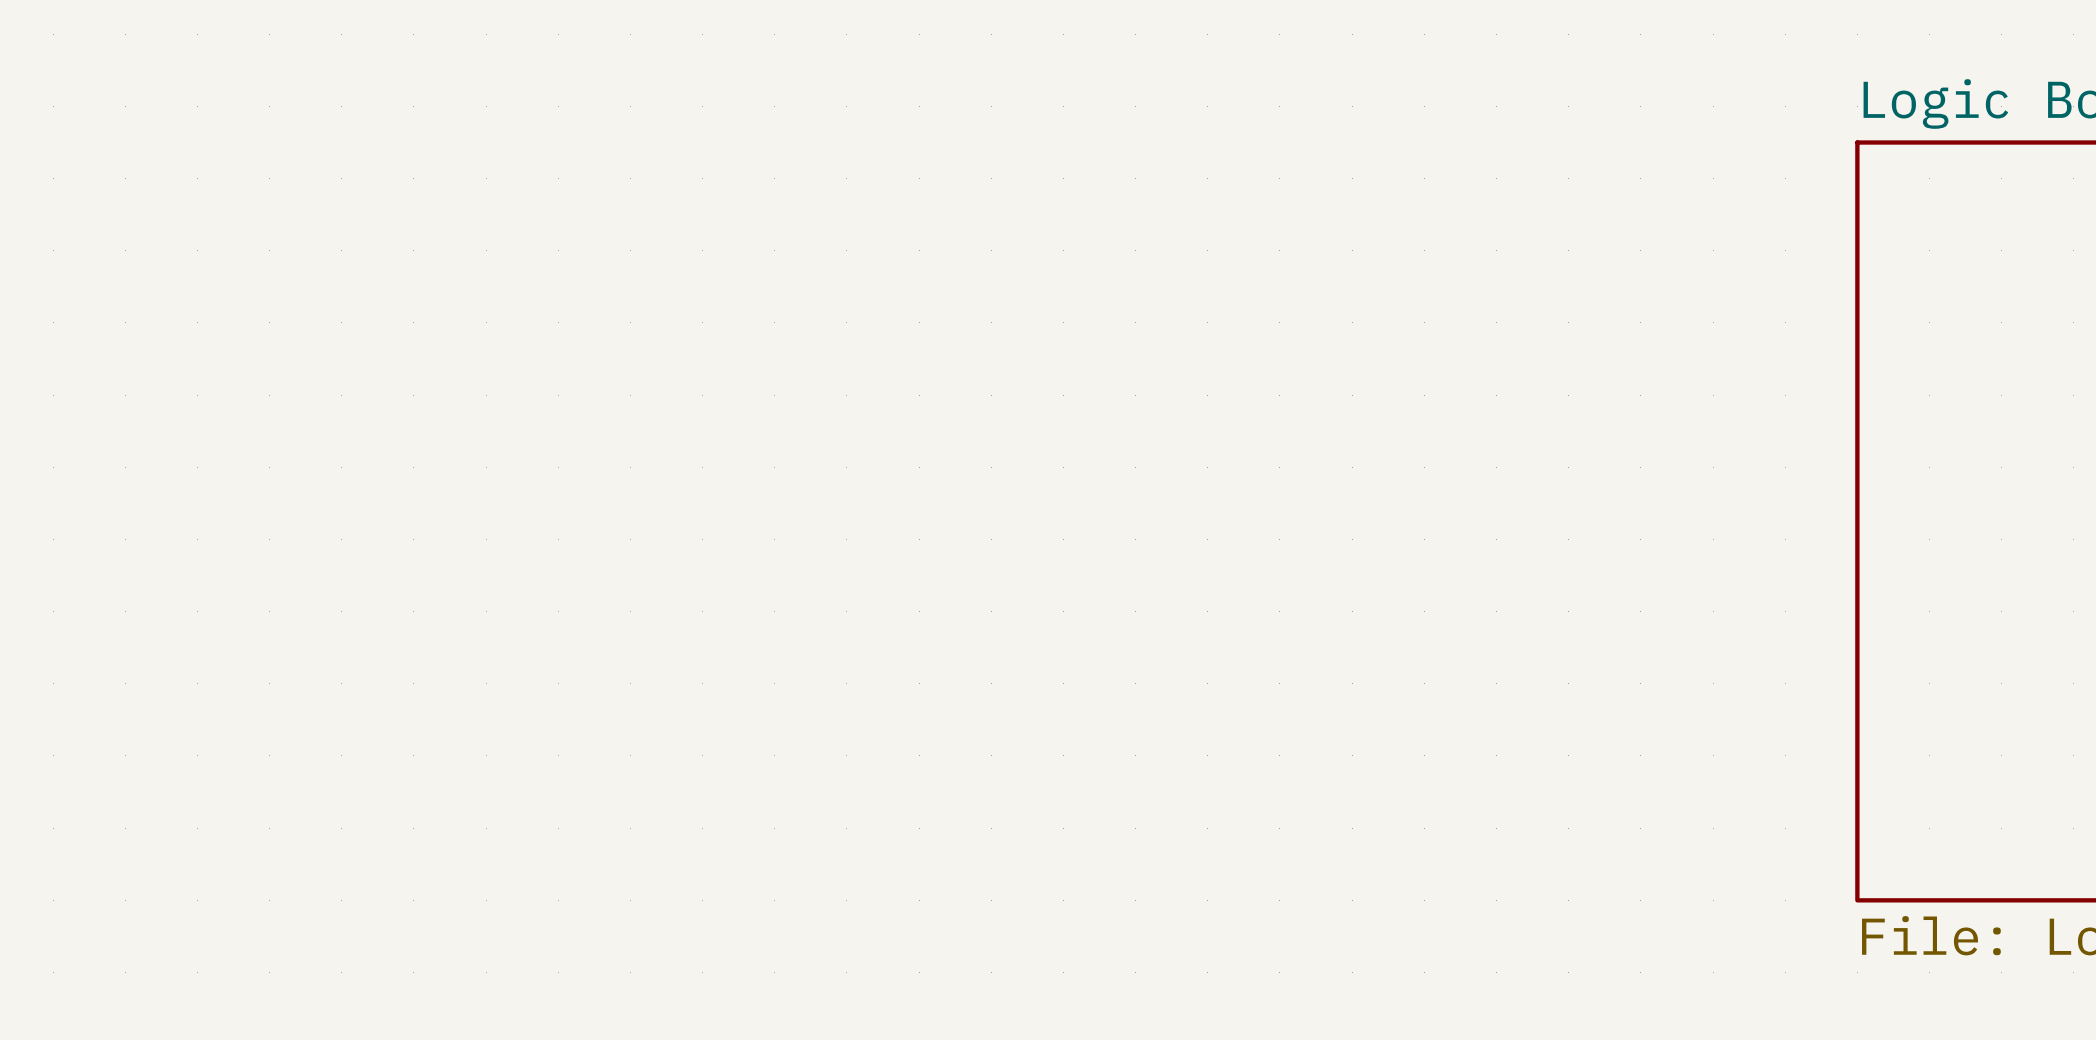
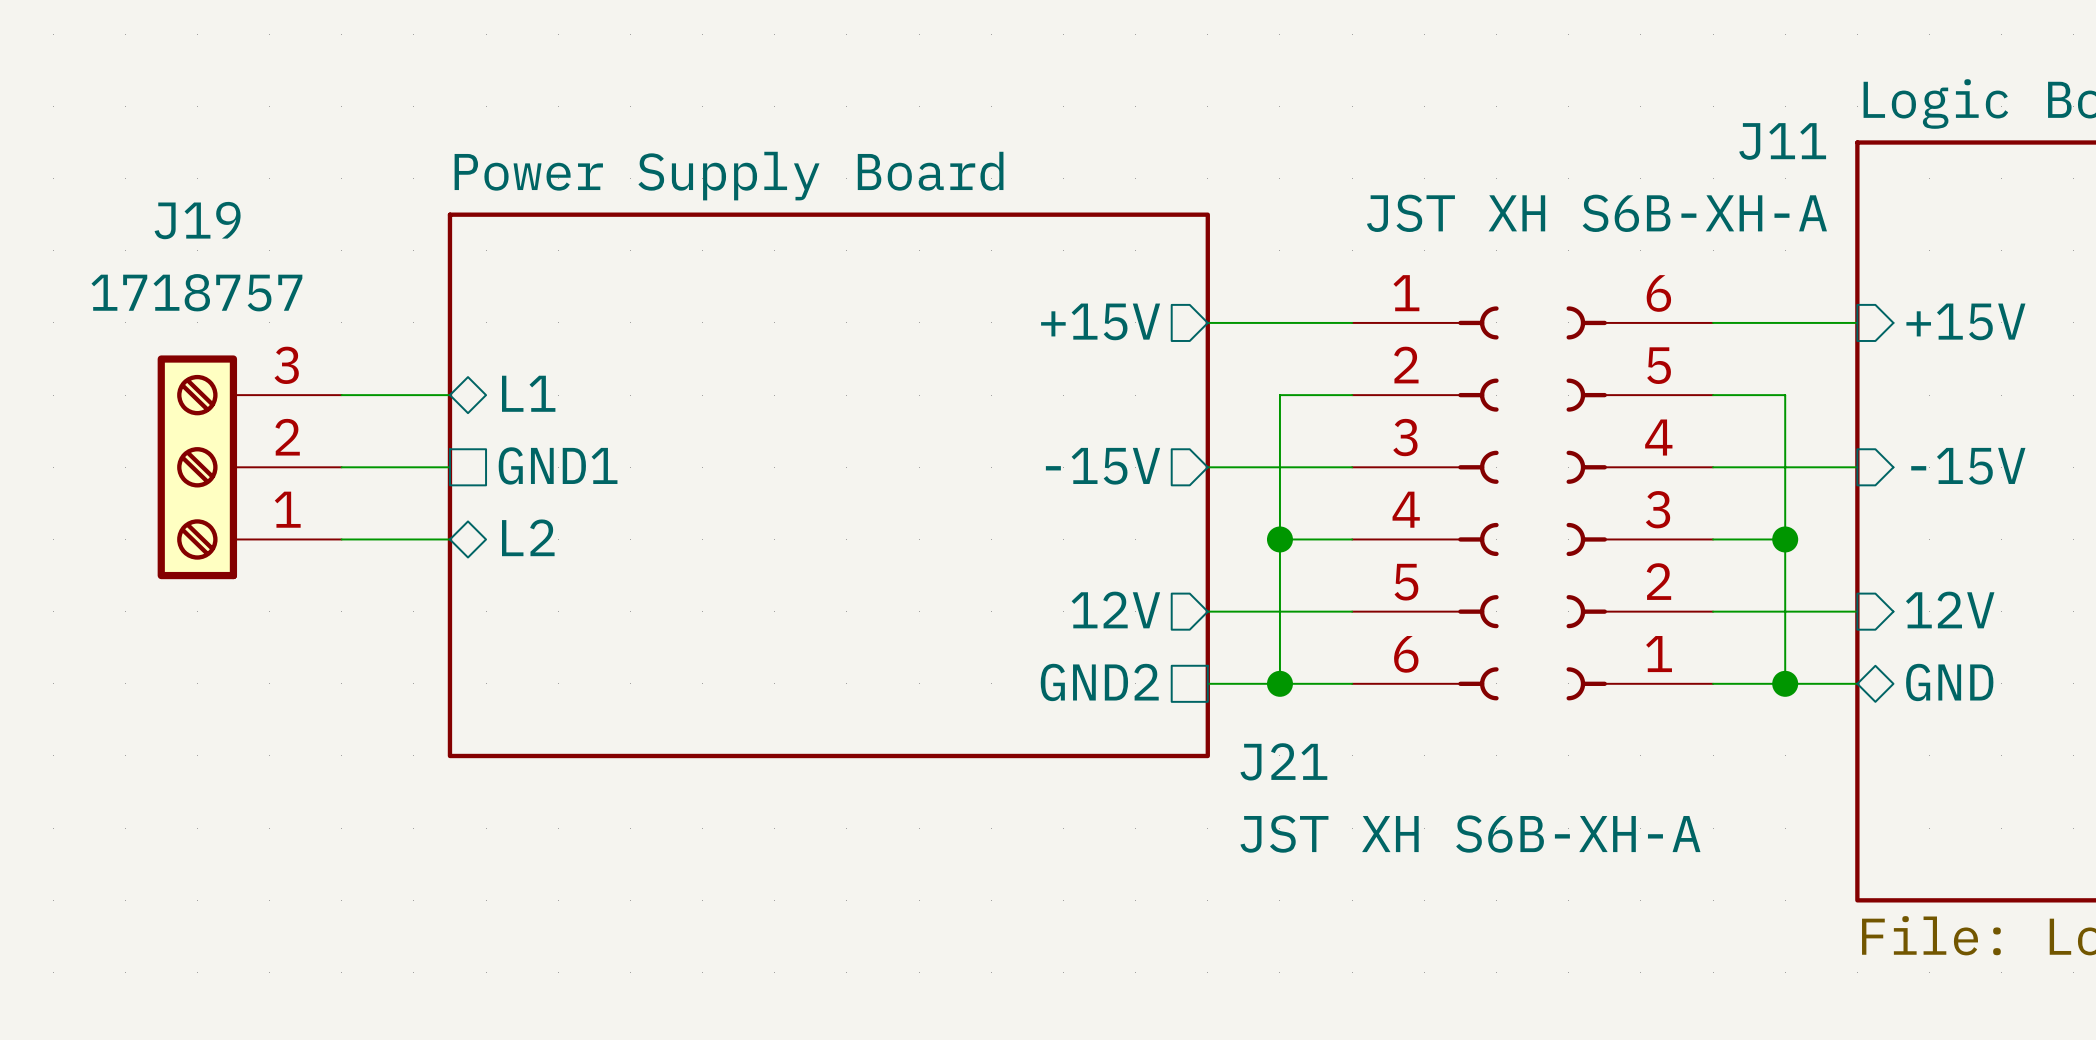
sheet pin: none -> +15V (1100, 321)
sheet pin: none -> +15V (1965, 321)
wire: none -> (1207, 322) (1352, 322)
wire: none -> (1713, 322) (1857, 322)
sheet pin: none -> L1 (528, 393)
wire: none -> (341, 395) (449, 395)
wire: none -> (1352, 395) (1279, 395) (1279, 683)
wire: none -> (1713, 395) (1785, 395) (1785, 683)
sheet pin: none -> GND1 (558, 465)
sheet pin: none -> -15V (1103, 466)
sheet pin: none -> -15V (1968, 466)
J19: none -> 1718757 (249, 467)
wire: none -> (341, 467) (449, 467)
wire: none -> (1207, 467) (1352, 467)
wire: none -> (1713, 467) (1857, 467)
sheet Power Supply Board: none -> (828, 485)
J21: none -> JST XH S6B-XH-A (1425, 503)
J11: none -> JST XH S6B-XH-A (1639, 503)
sheet pin: none -> L2 (528, 537)
wire: none -> (341, 539) (449, 539)
wire: none -> (1279, 539) (1352, 539)
junction: none -> (1279, 539)
wire: none -> (1713, 539) (1785, 539)
junction: none -> (1785, 539)
sheet pin: none -> 12V (1115, 609)
sheet pin: none -> 12V (1950, 609)
wire: none -> (1207, 611) (1352, 611)
wire: none -> (1713, 611) (1857, 611)
sheet pin: none -> GND2 (1099, 682)
sheet pin: none -> GND (1949, 682)
wire: none -> (1207, 683) (1352, 683)
junction: none -> (1279, 683)
wire: none -> (1713, 683) (1857, 683)
junction: none -> (1785, 683)

